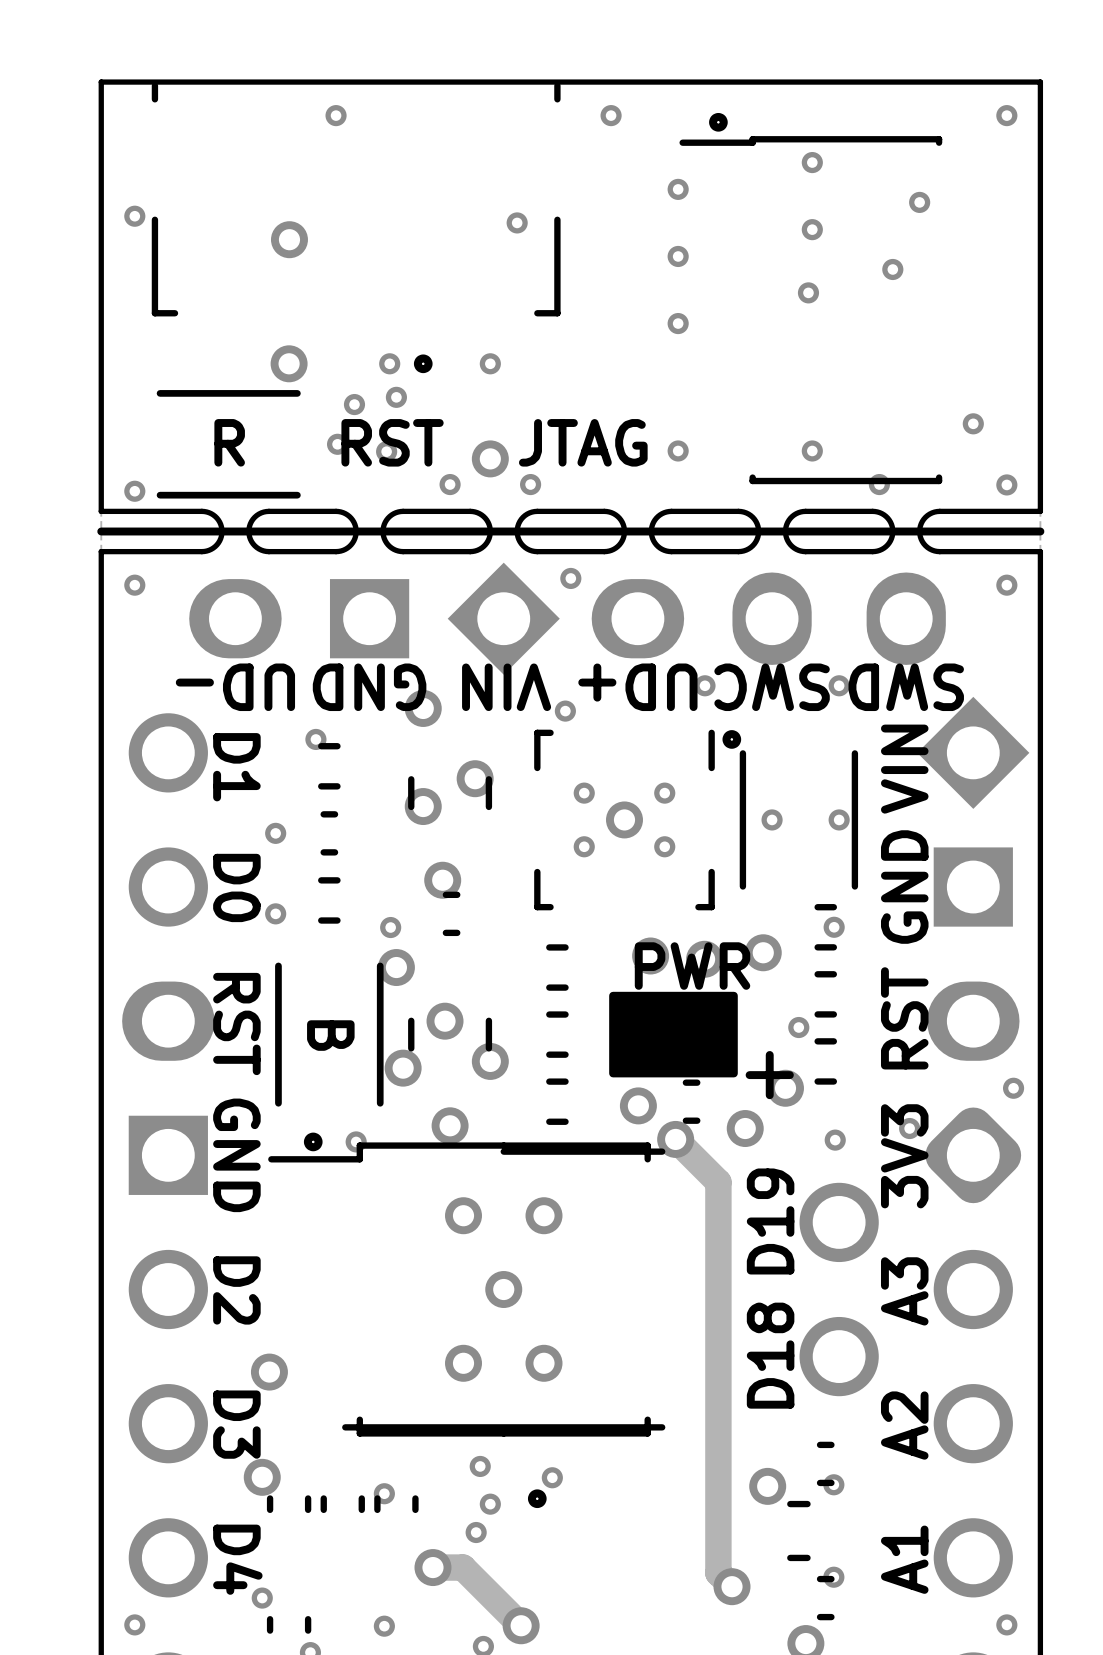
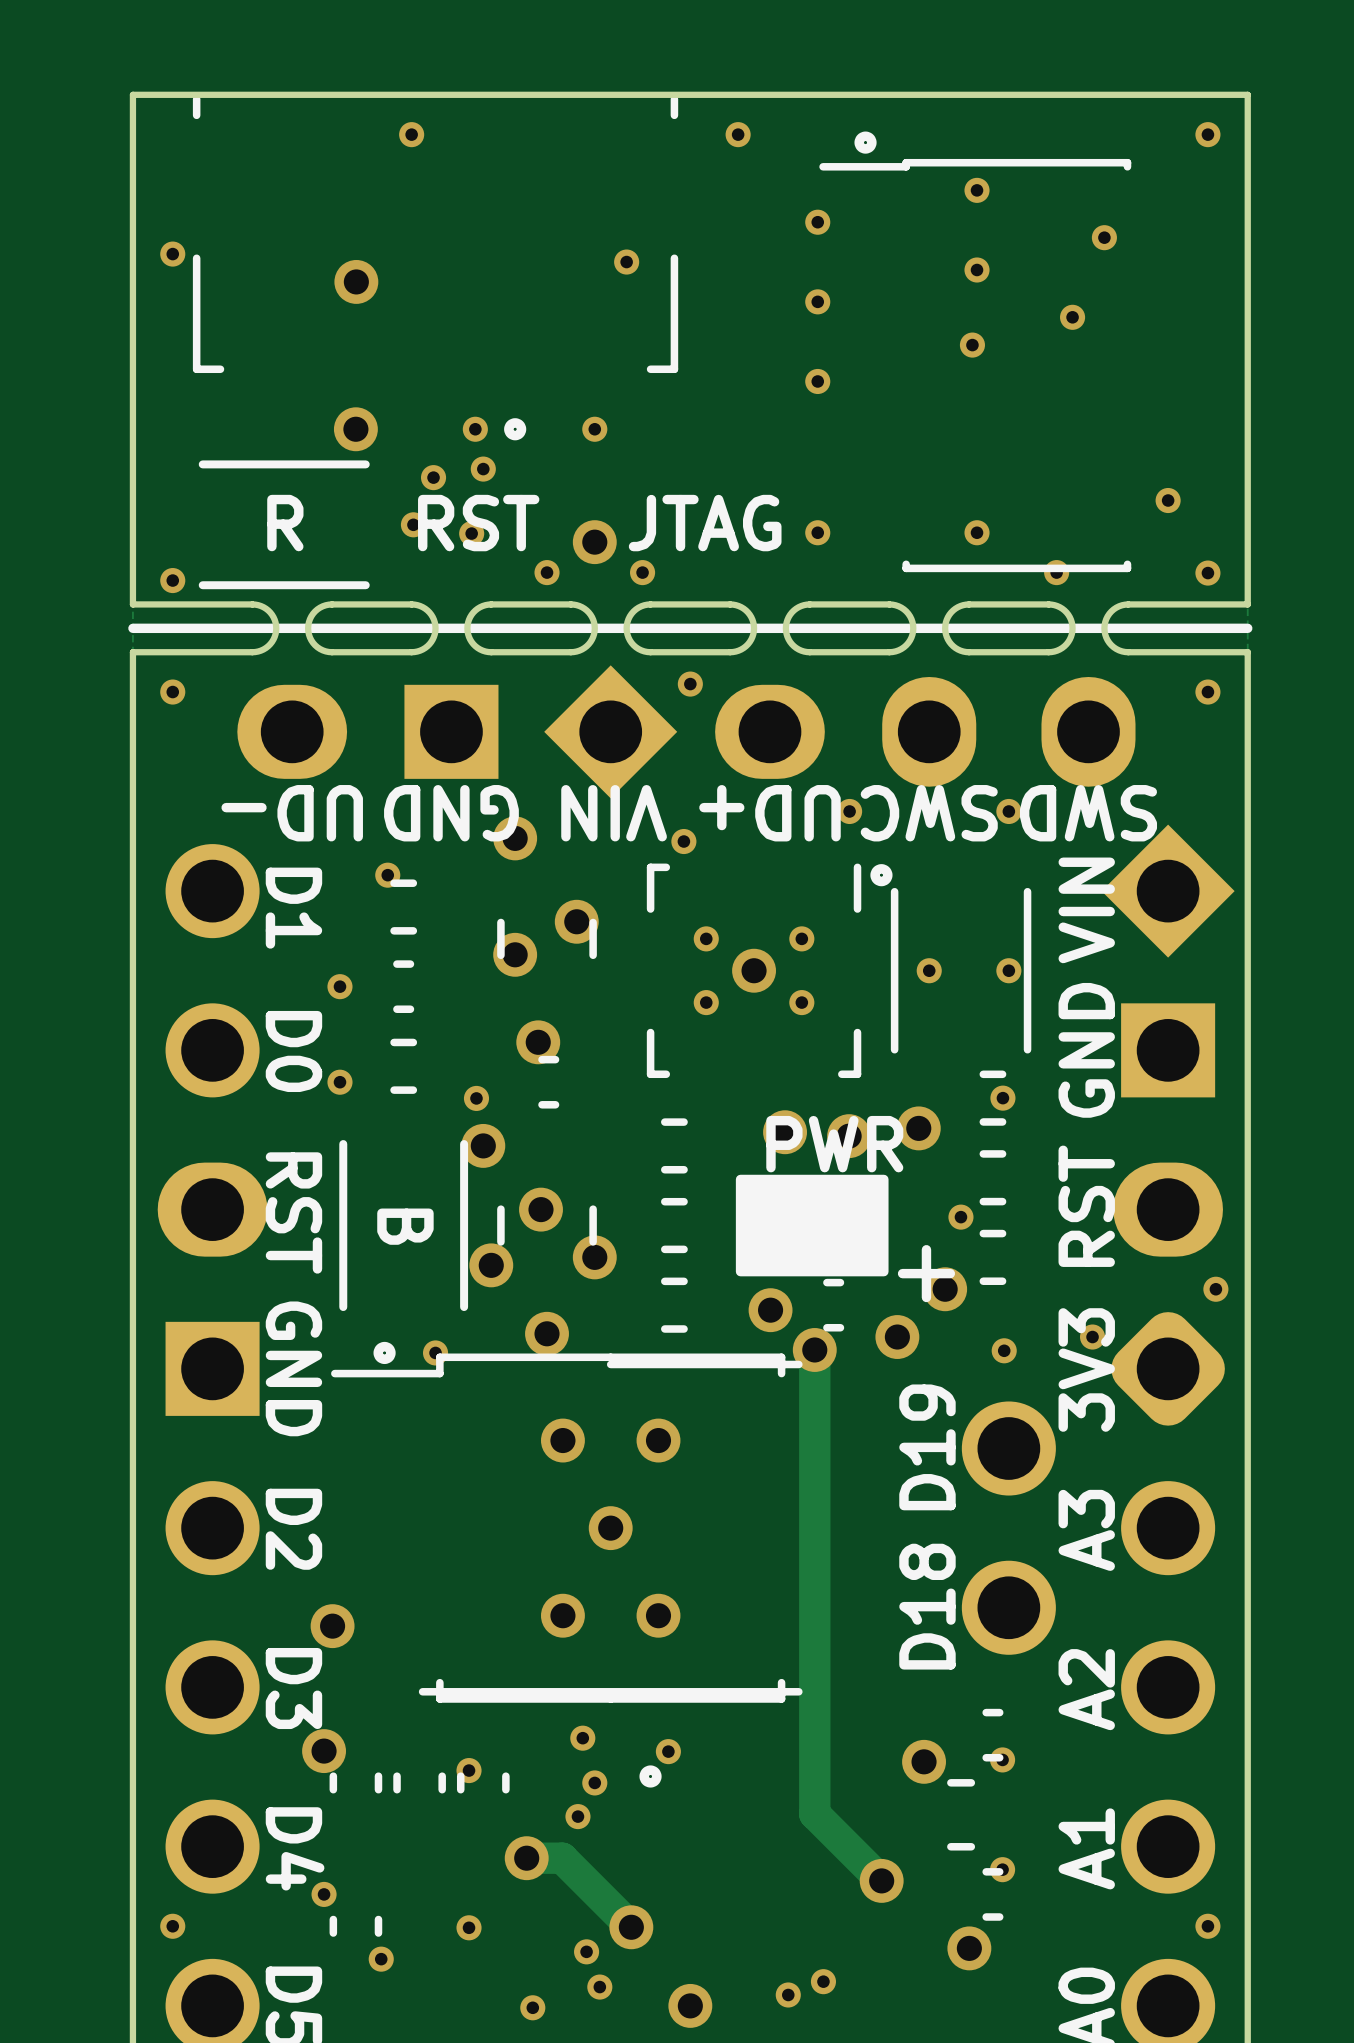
track: (675, 1139) (718, 1182) (718, 1573) -> (814, 1349) (814, 1814) (865, 1864)

